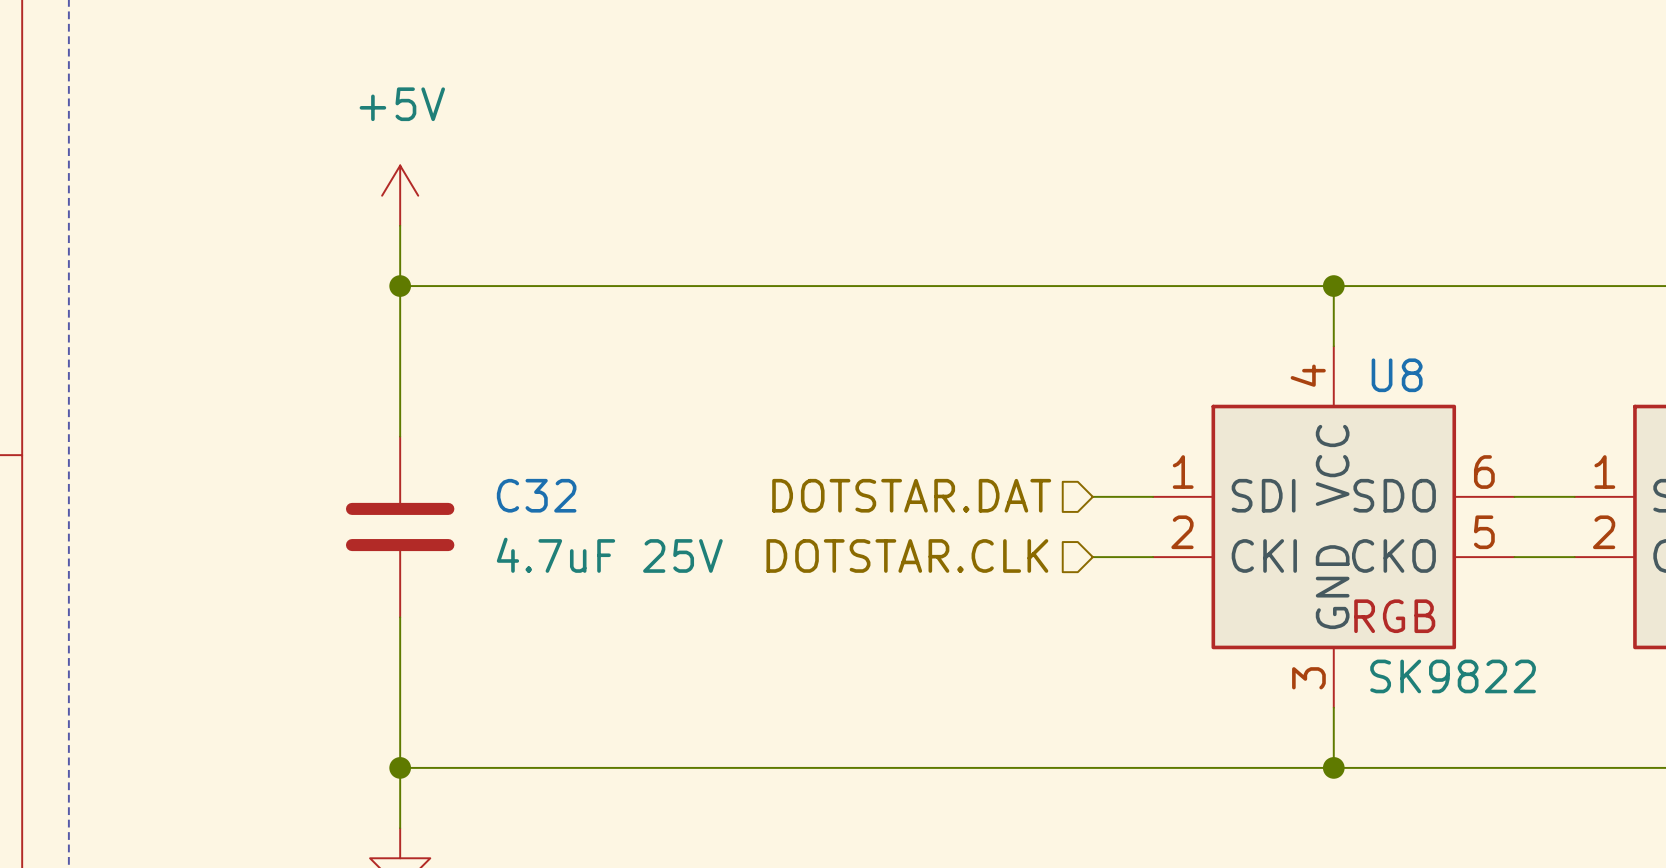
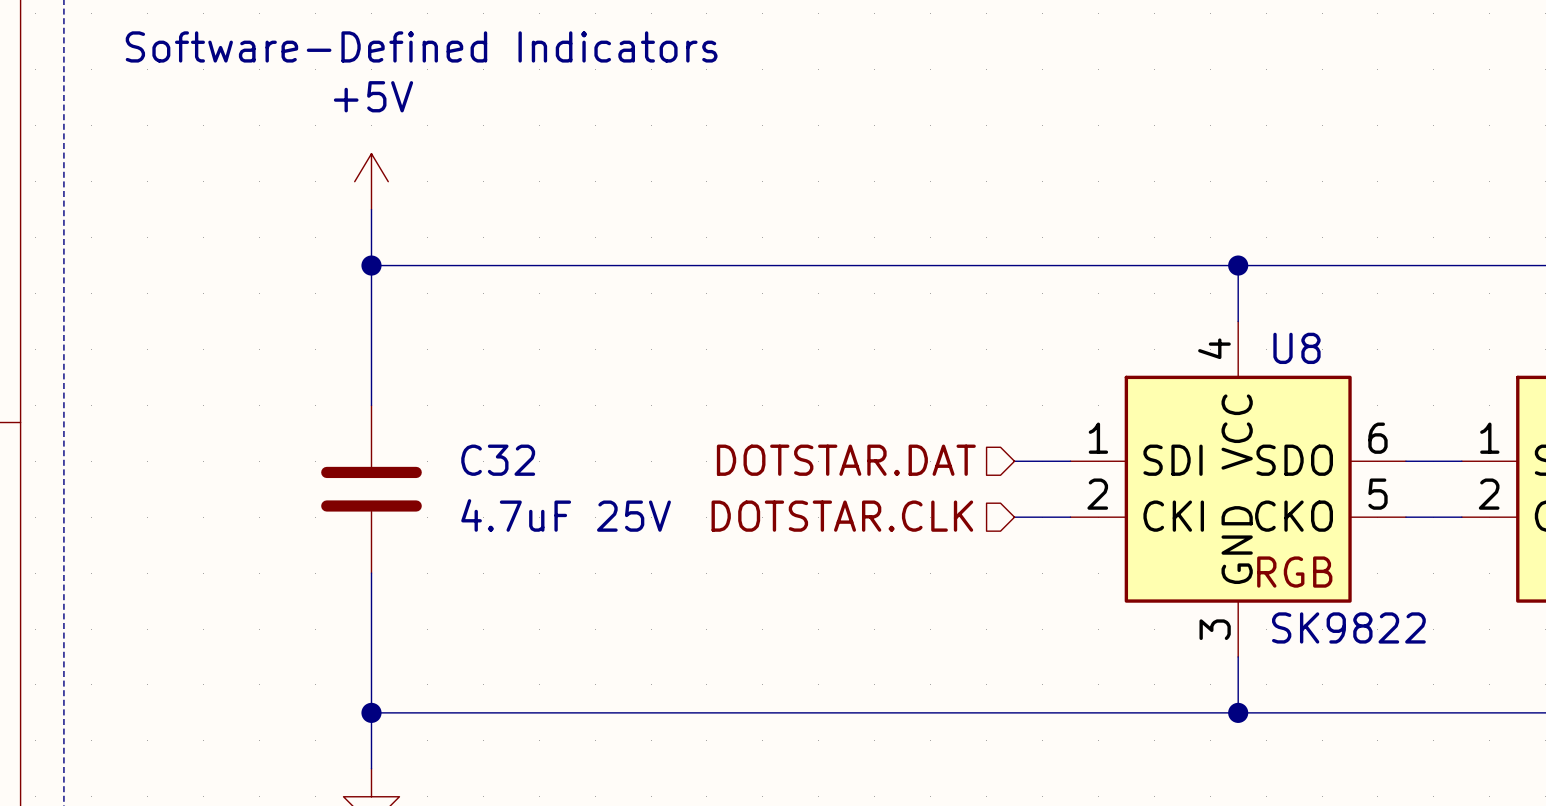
text: none -> Software-Defined Indicators (421, 46)

